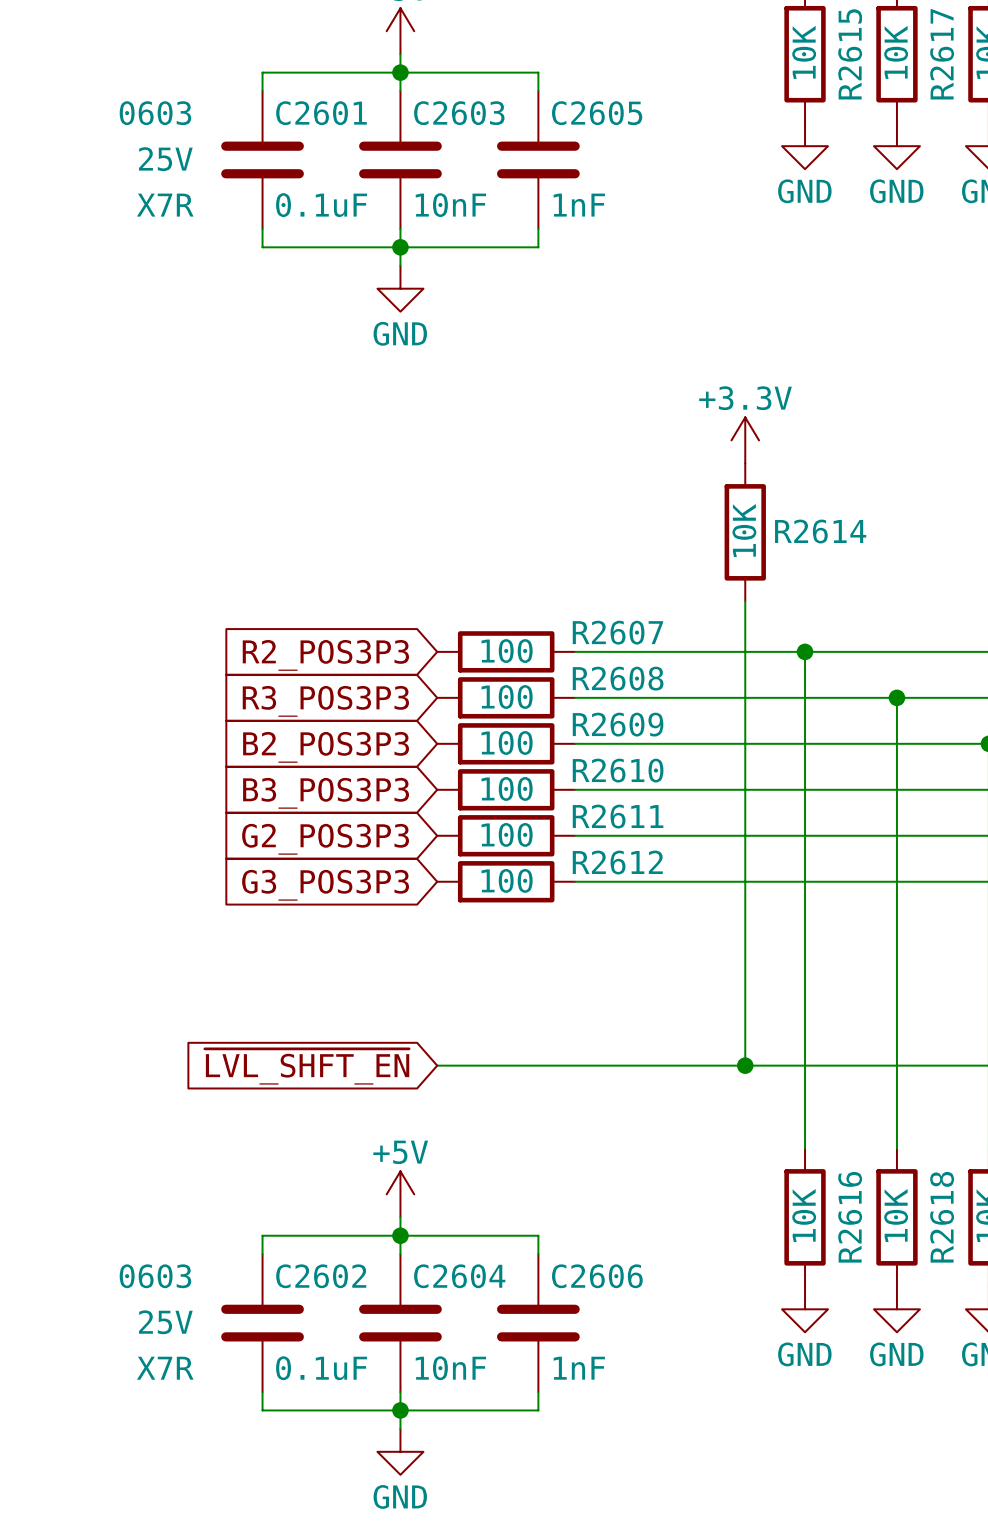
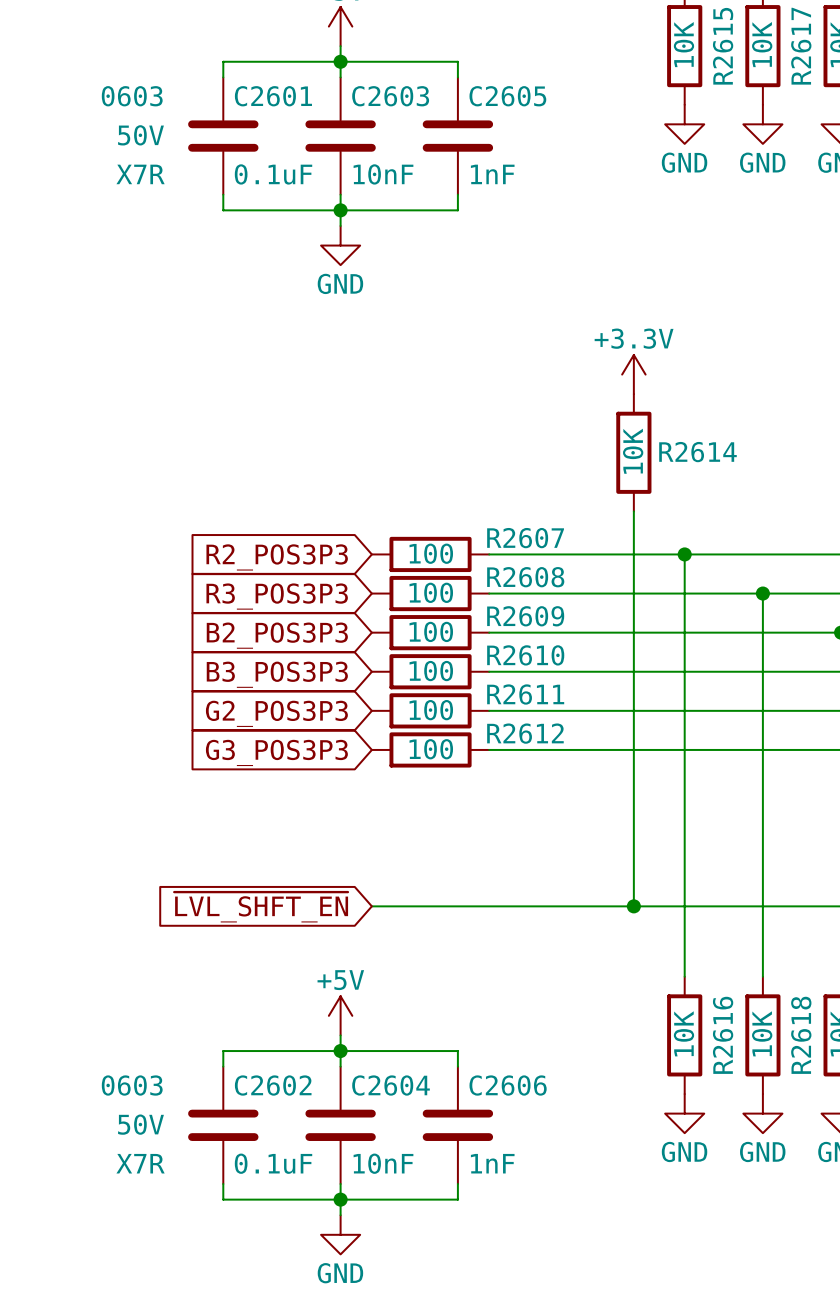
C2601 text: 25V (165, 159) -> 50V (140, 135)
C2602 text: 25V (165, 1322) -> 50V (140, 1124)

